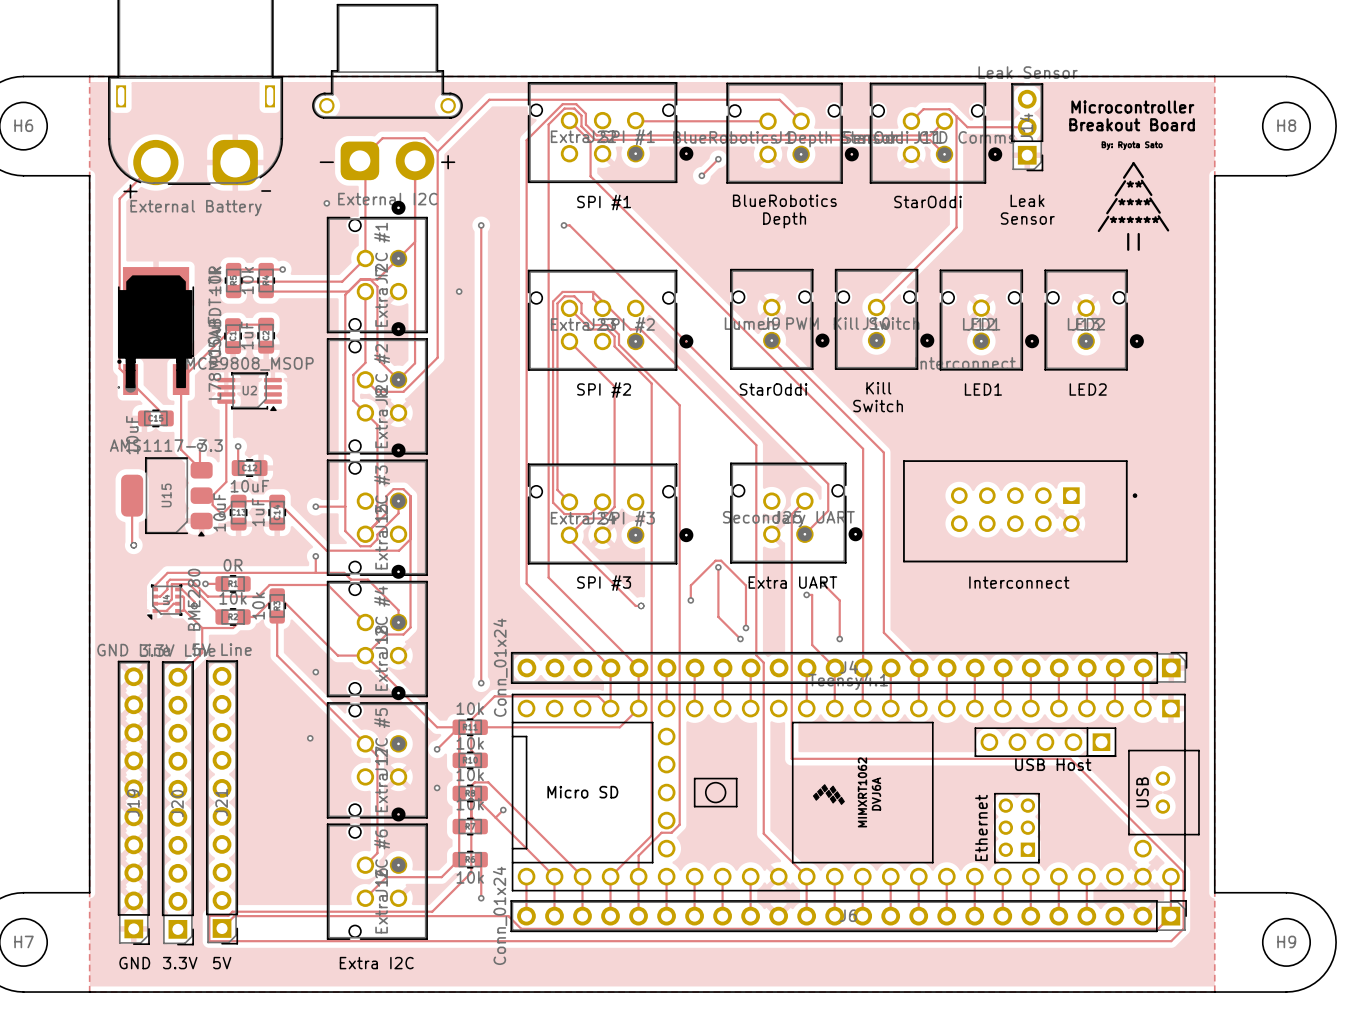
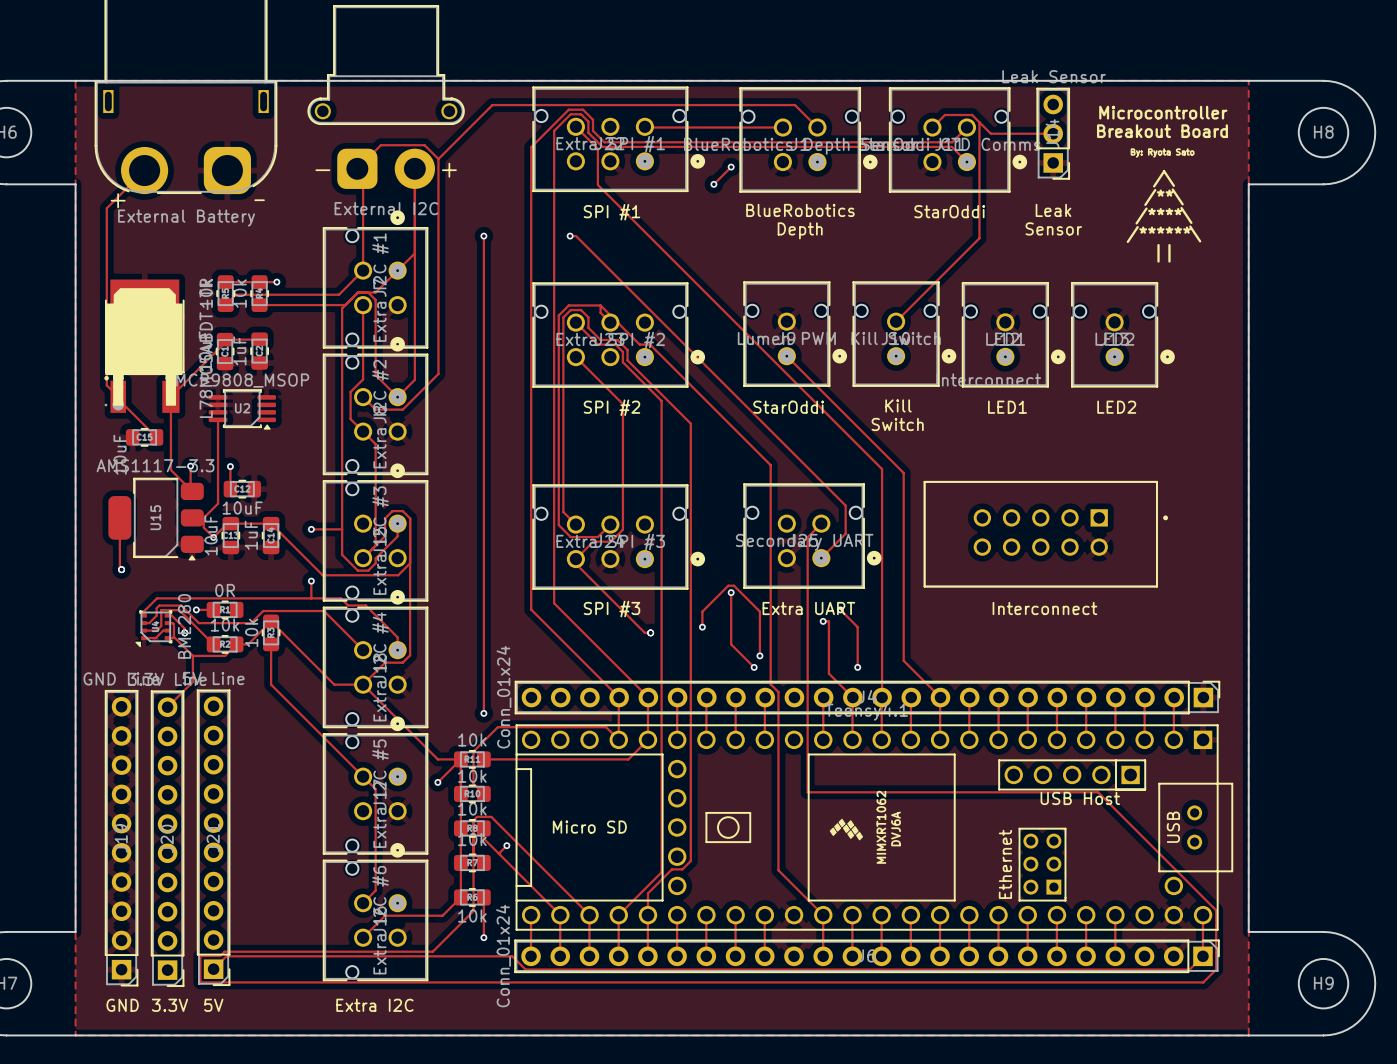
via: (326, 203) -> none
via: (459, 291) -> none
via: (315, 672) -> none
via: (310, 738) -> none
via: (437, 787) -> none

